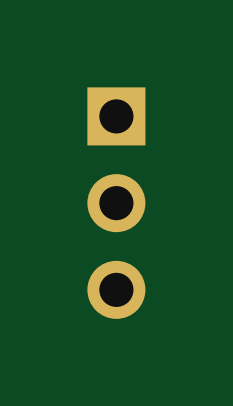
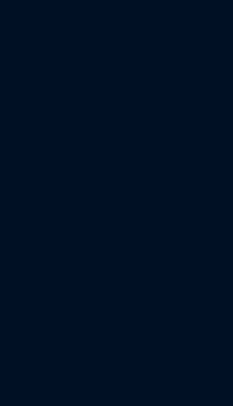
part: (116, 203) -> none

